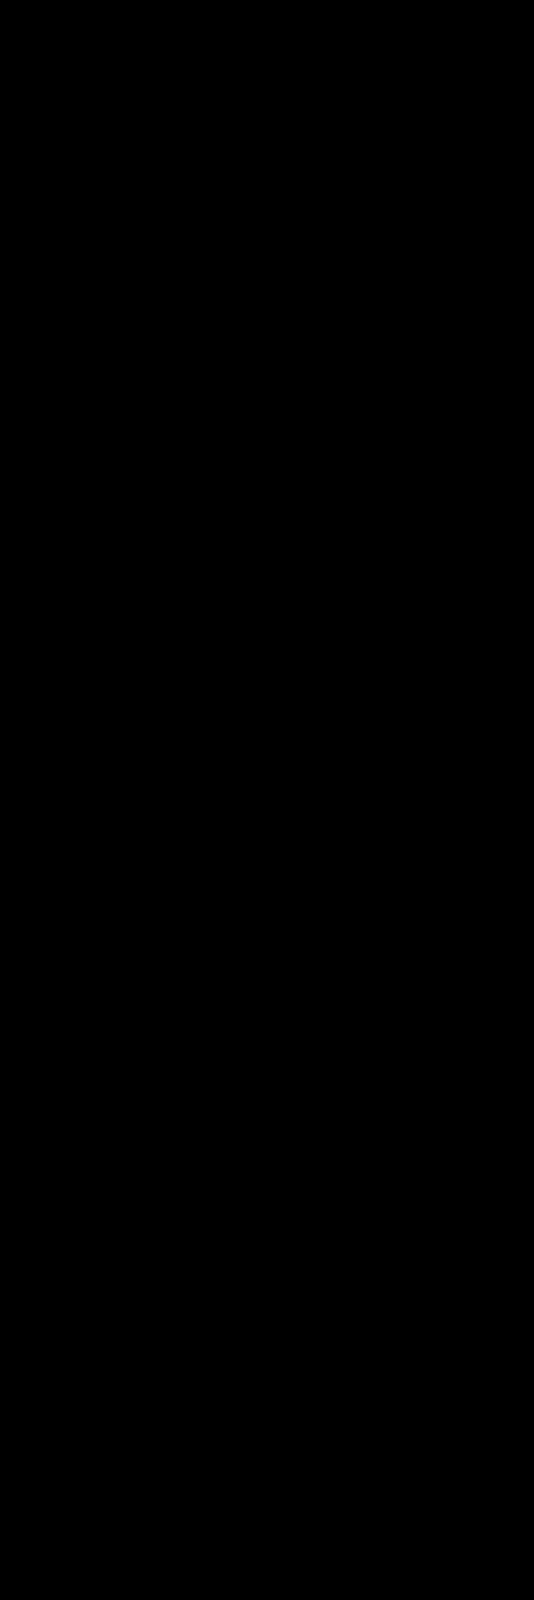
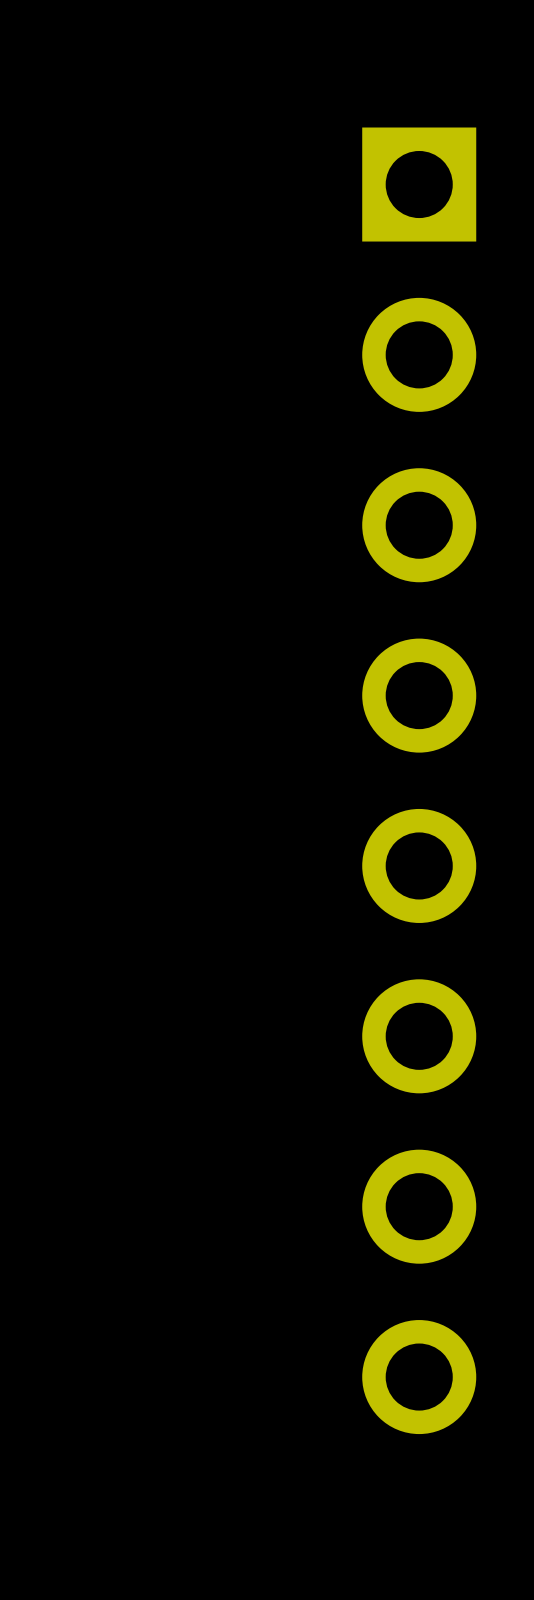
part: none -> (419, 780)

